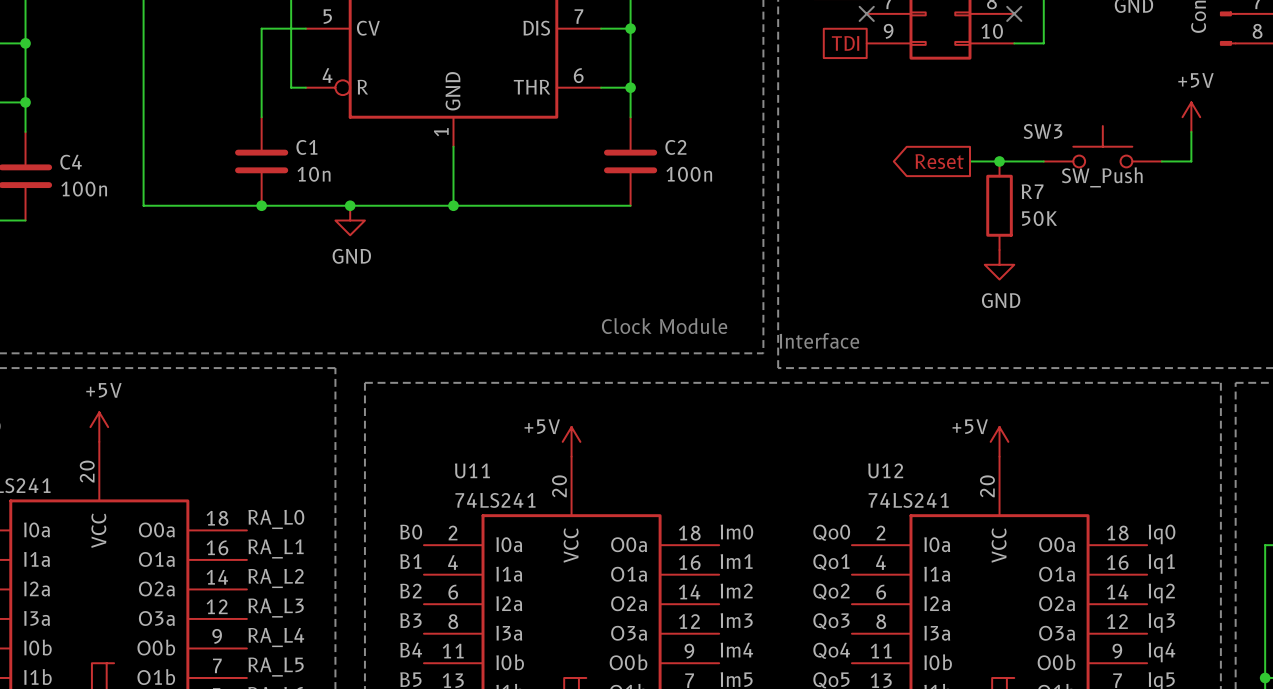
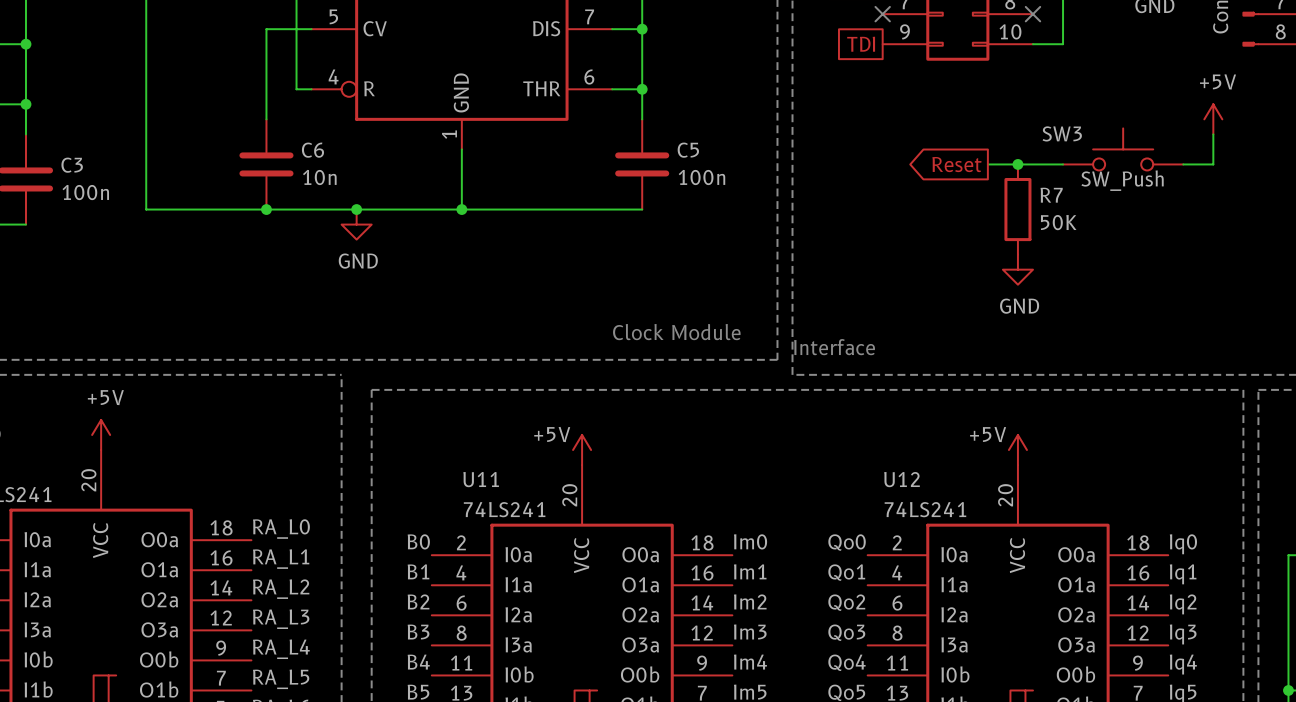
C1 name: C1 (306, 147) -> C6 (312, 150)
C2 name: C2 (675, 147) -> C5 (688, 150)
C4 name: C4 (71, 162) -> C3 (72, 165)

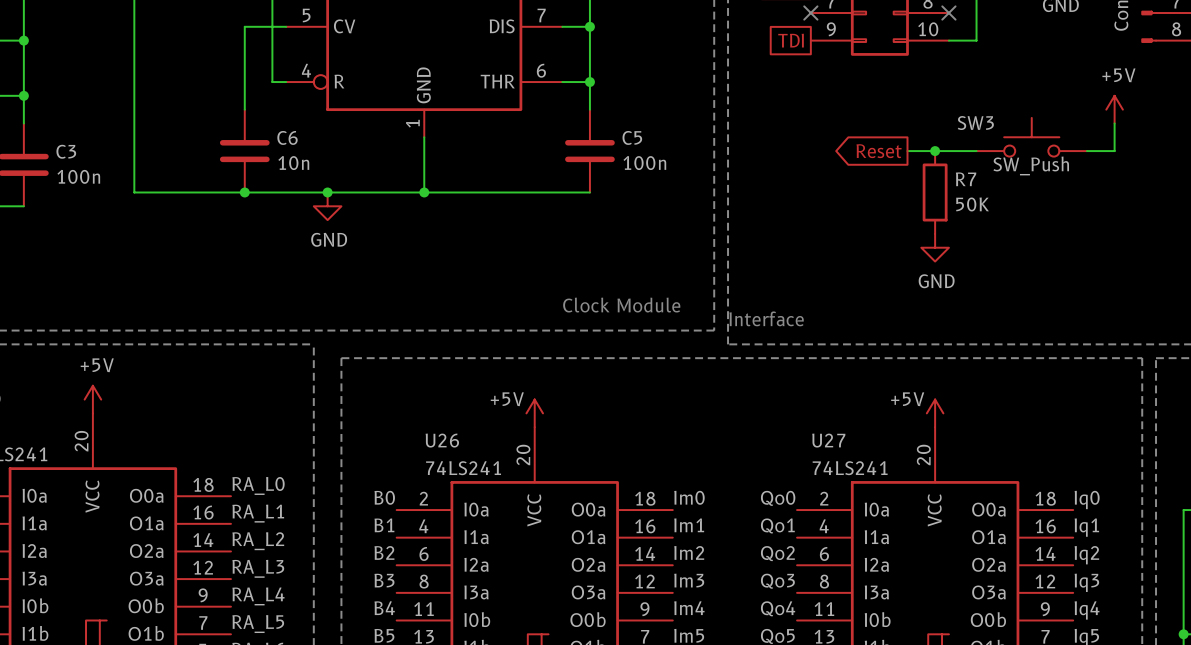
U11 name: U11 (481, 479) -> U26 (442, 440)
U12 name: U12 (901, 479) -> U27 (828, 440)

